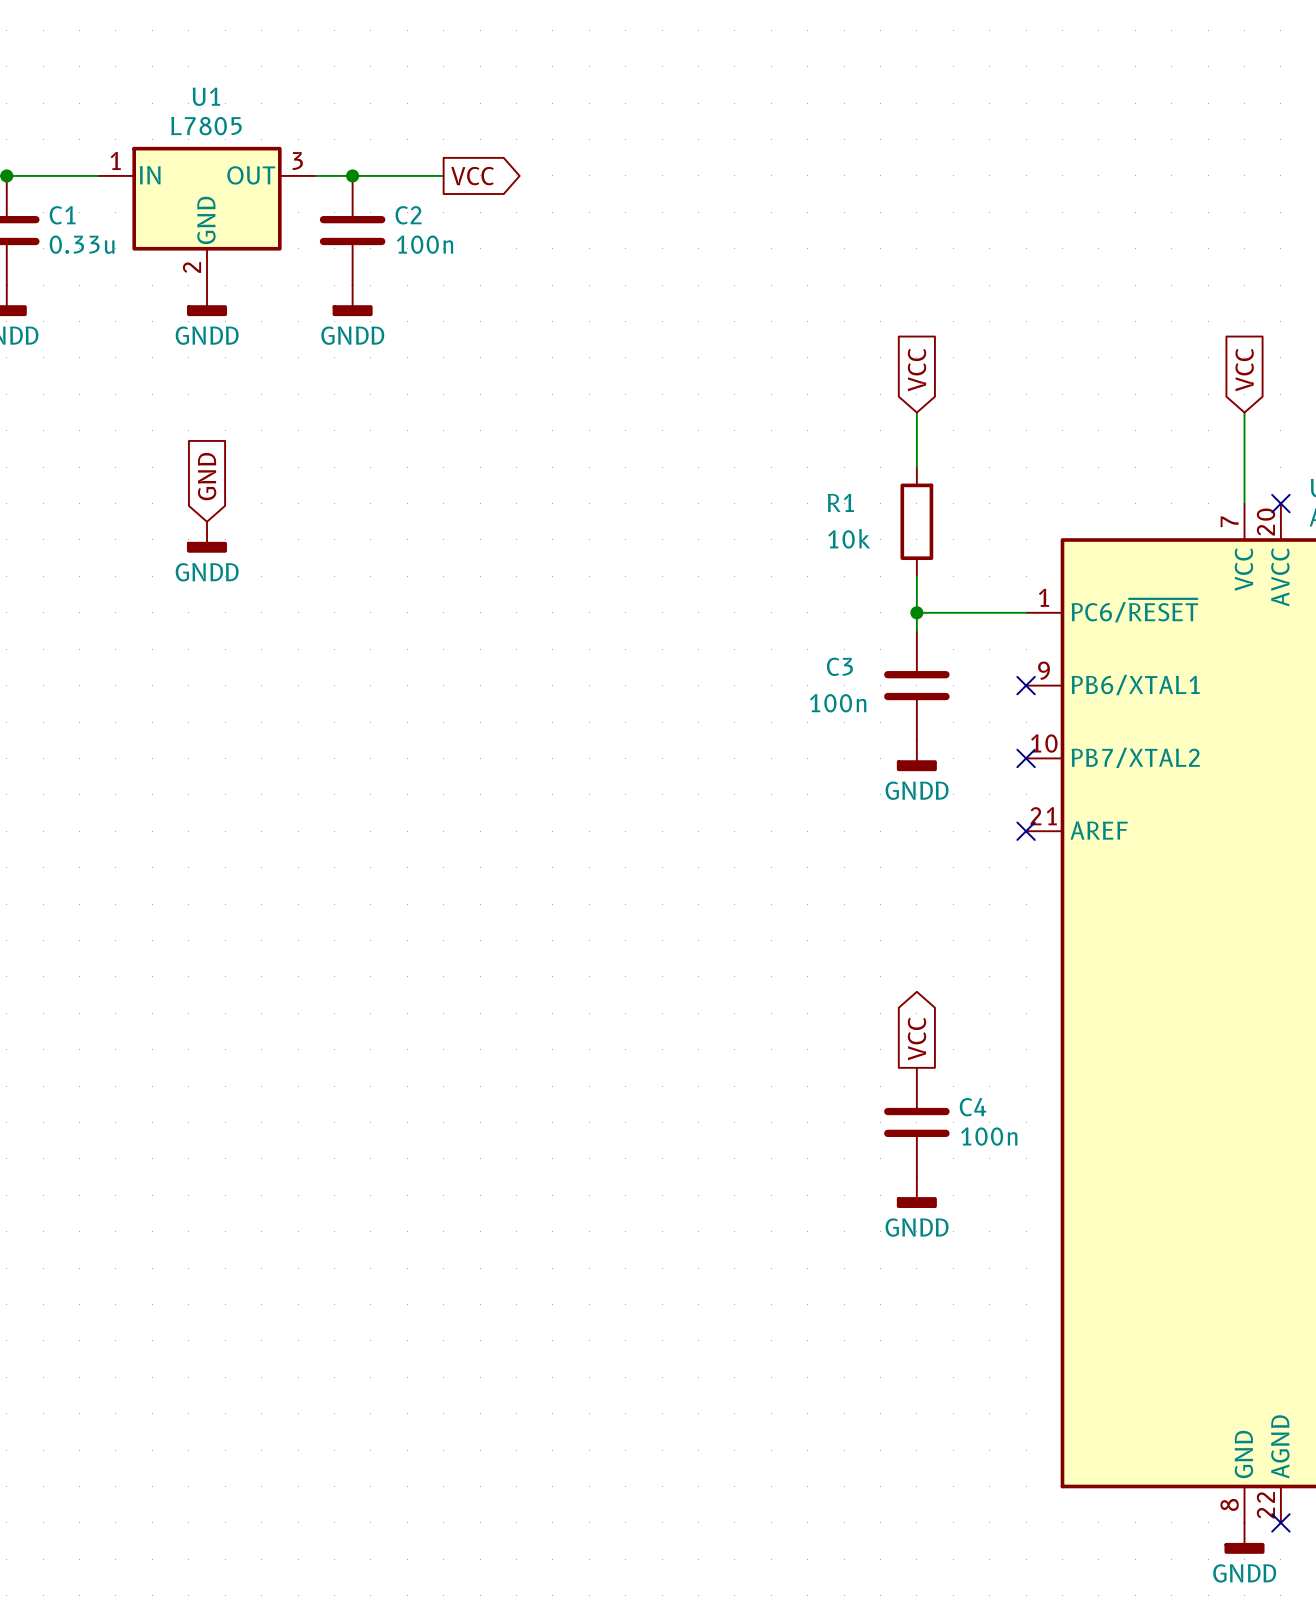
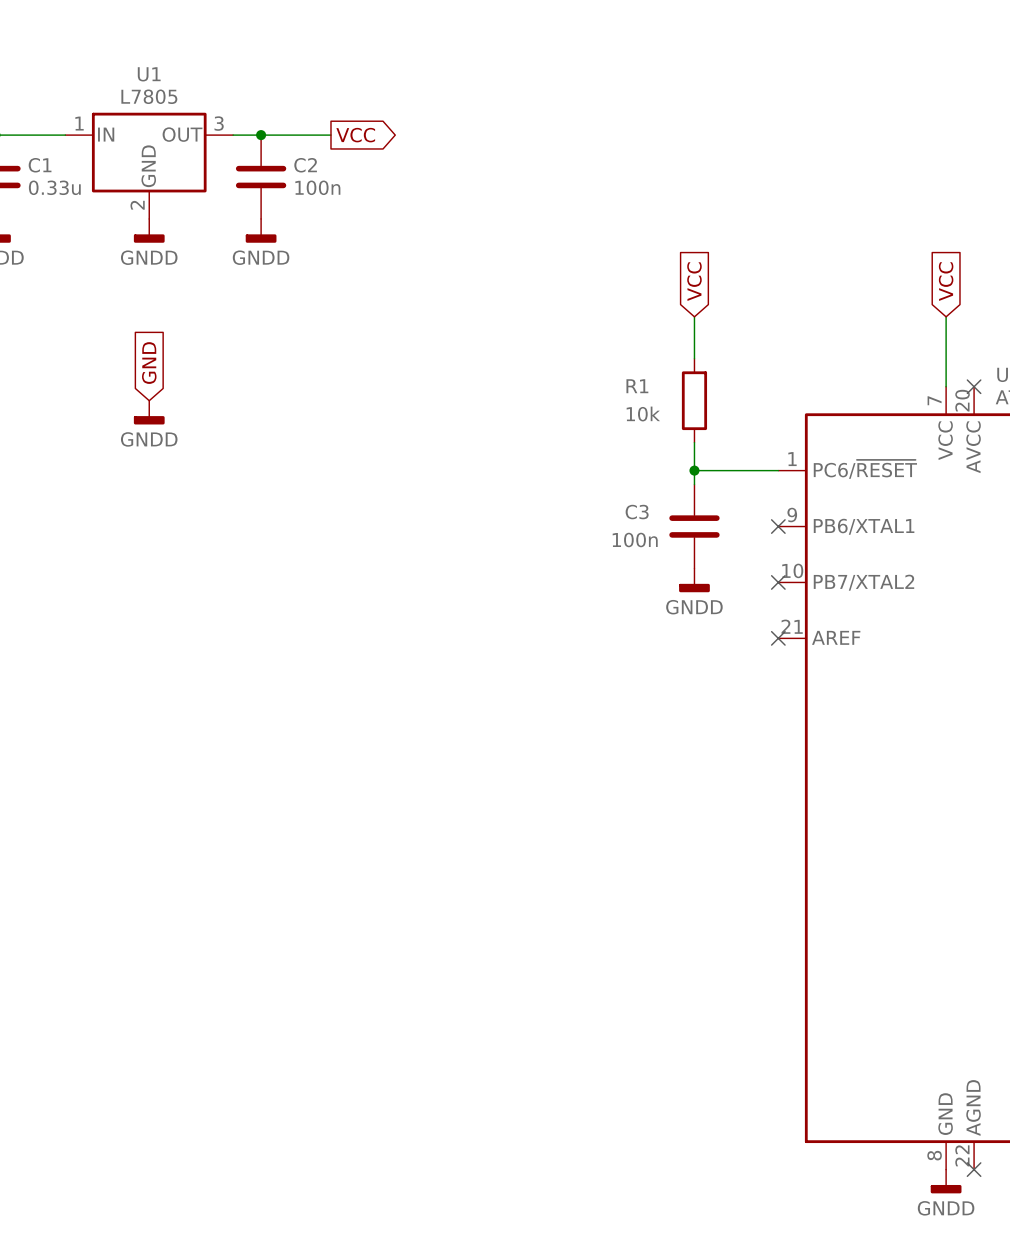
global label: VCC (916, 1038) -> none
C4: 100n (916, 1122) -> none
power symbol: GNDD (916, 1192) -> none

